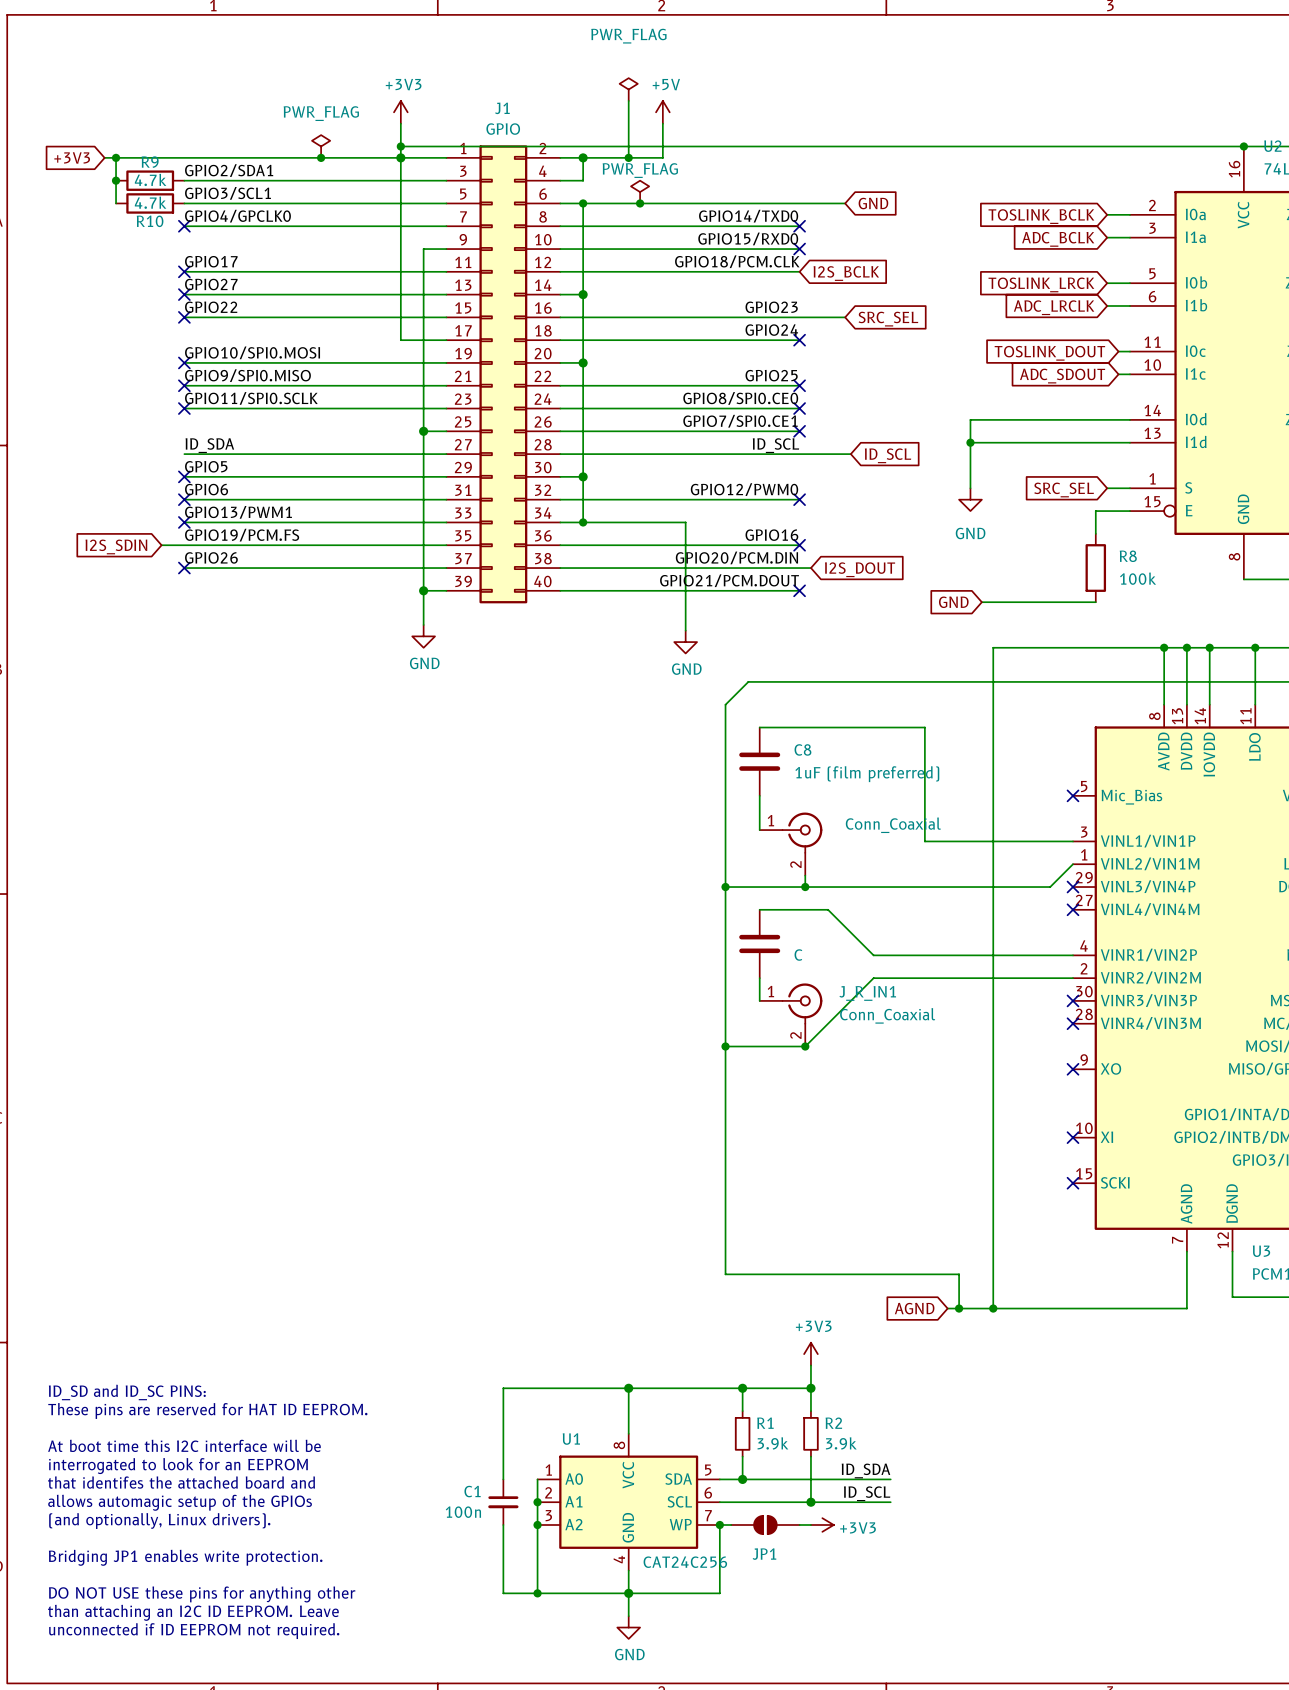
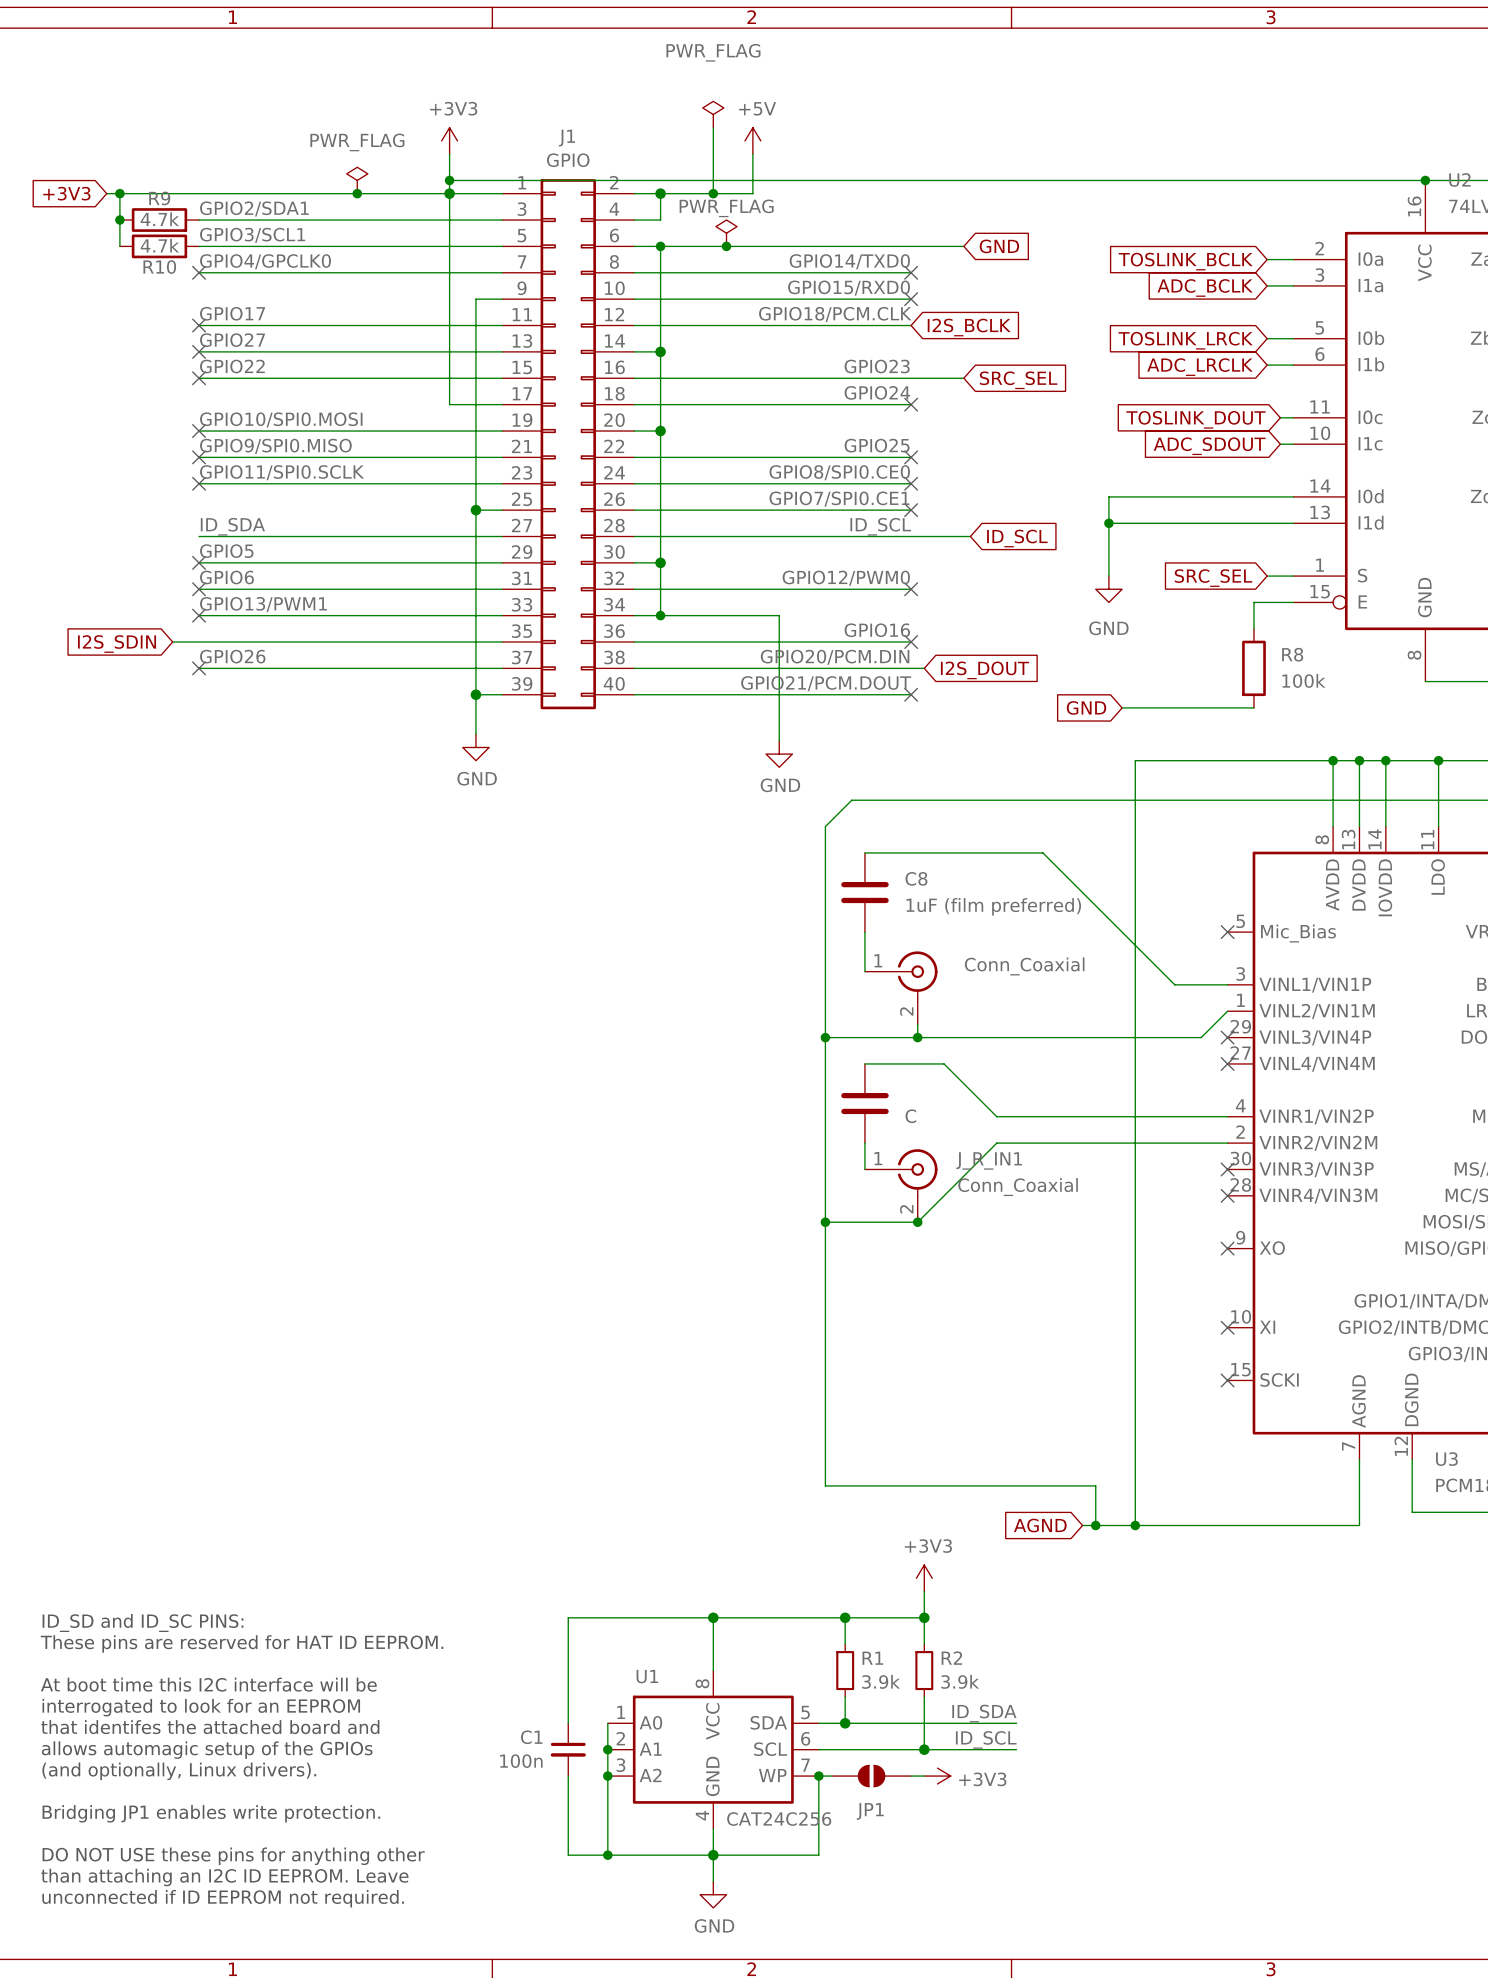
label: GPIO19/PCM.FS (242, 535) -> none
wire: (913, 727) (924, 727) (924, 841) (1027, 841) -> (1042, 852) (1174, 984)

